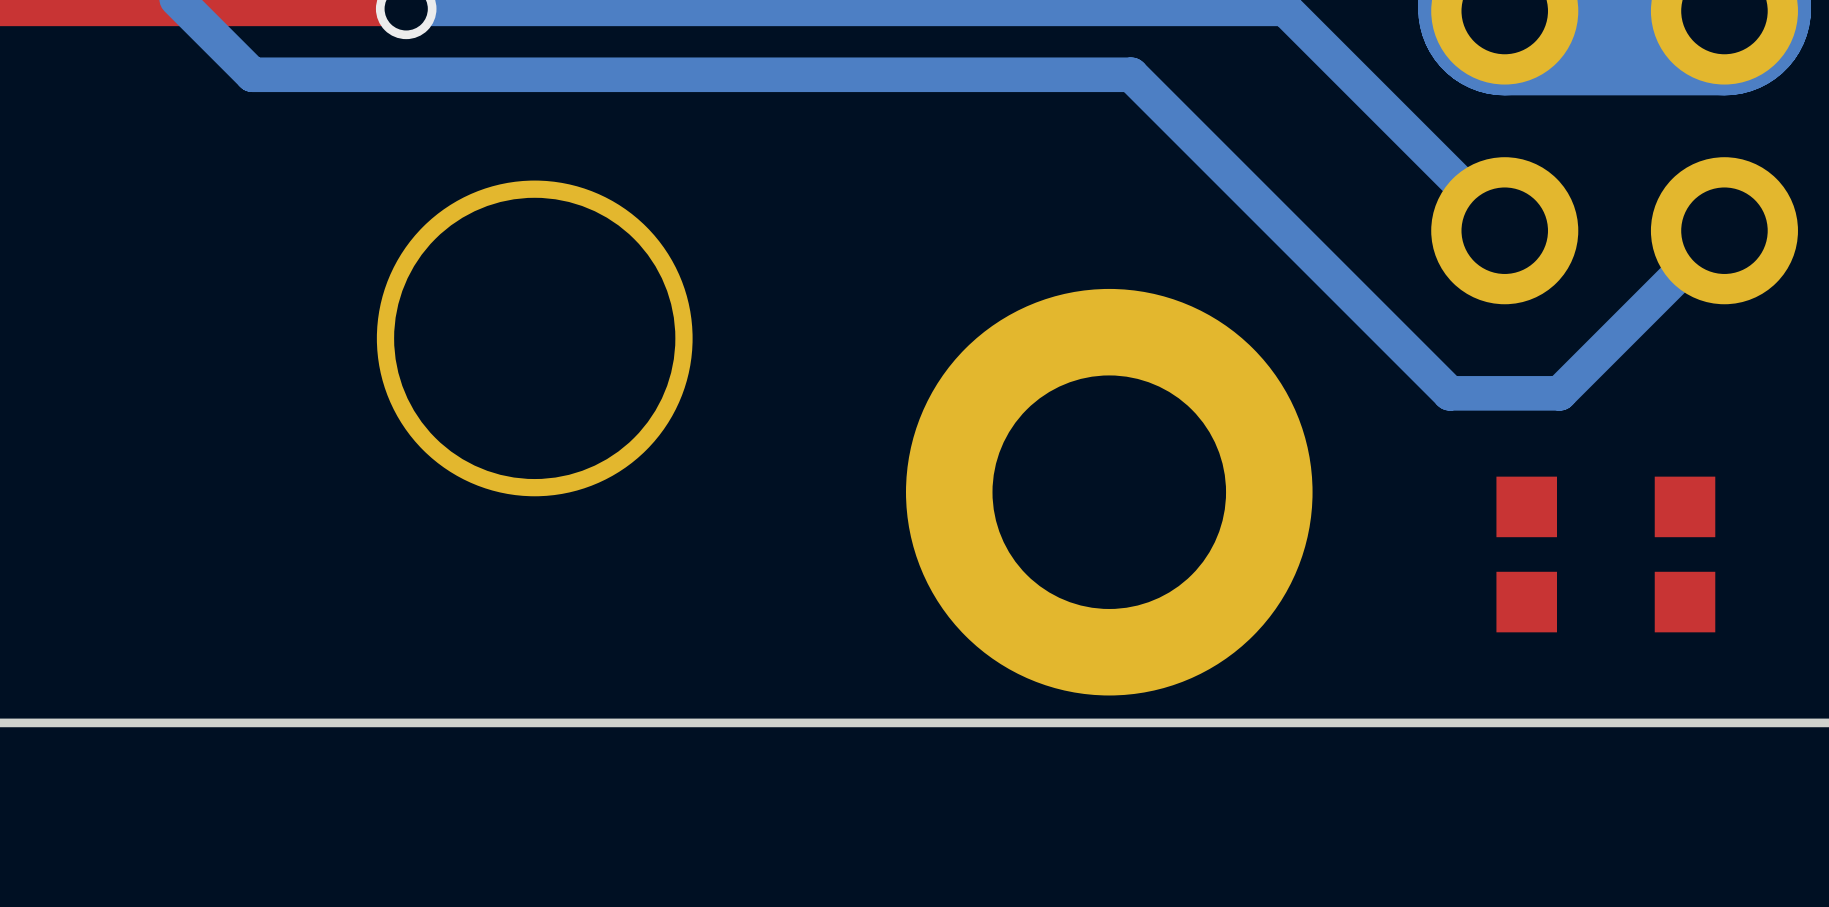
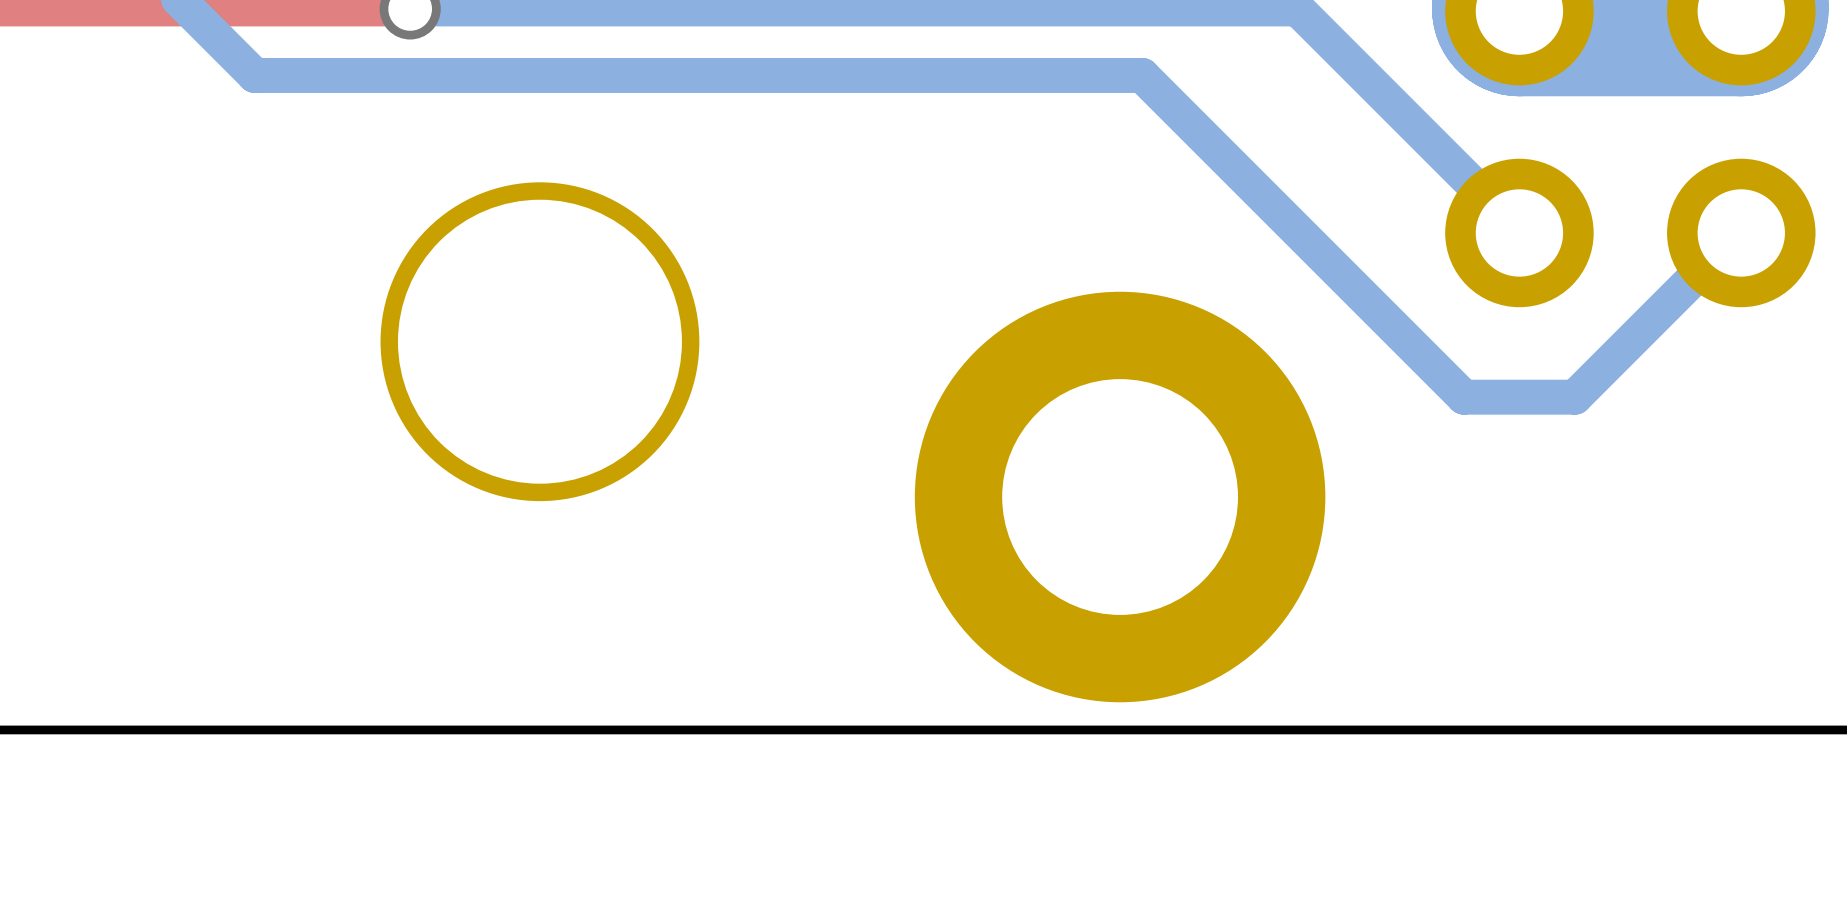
part: (1605, 554) -> none

